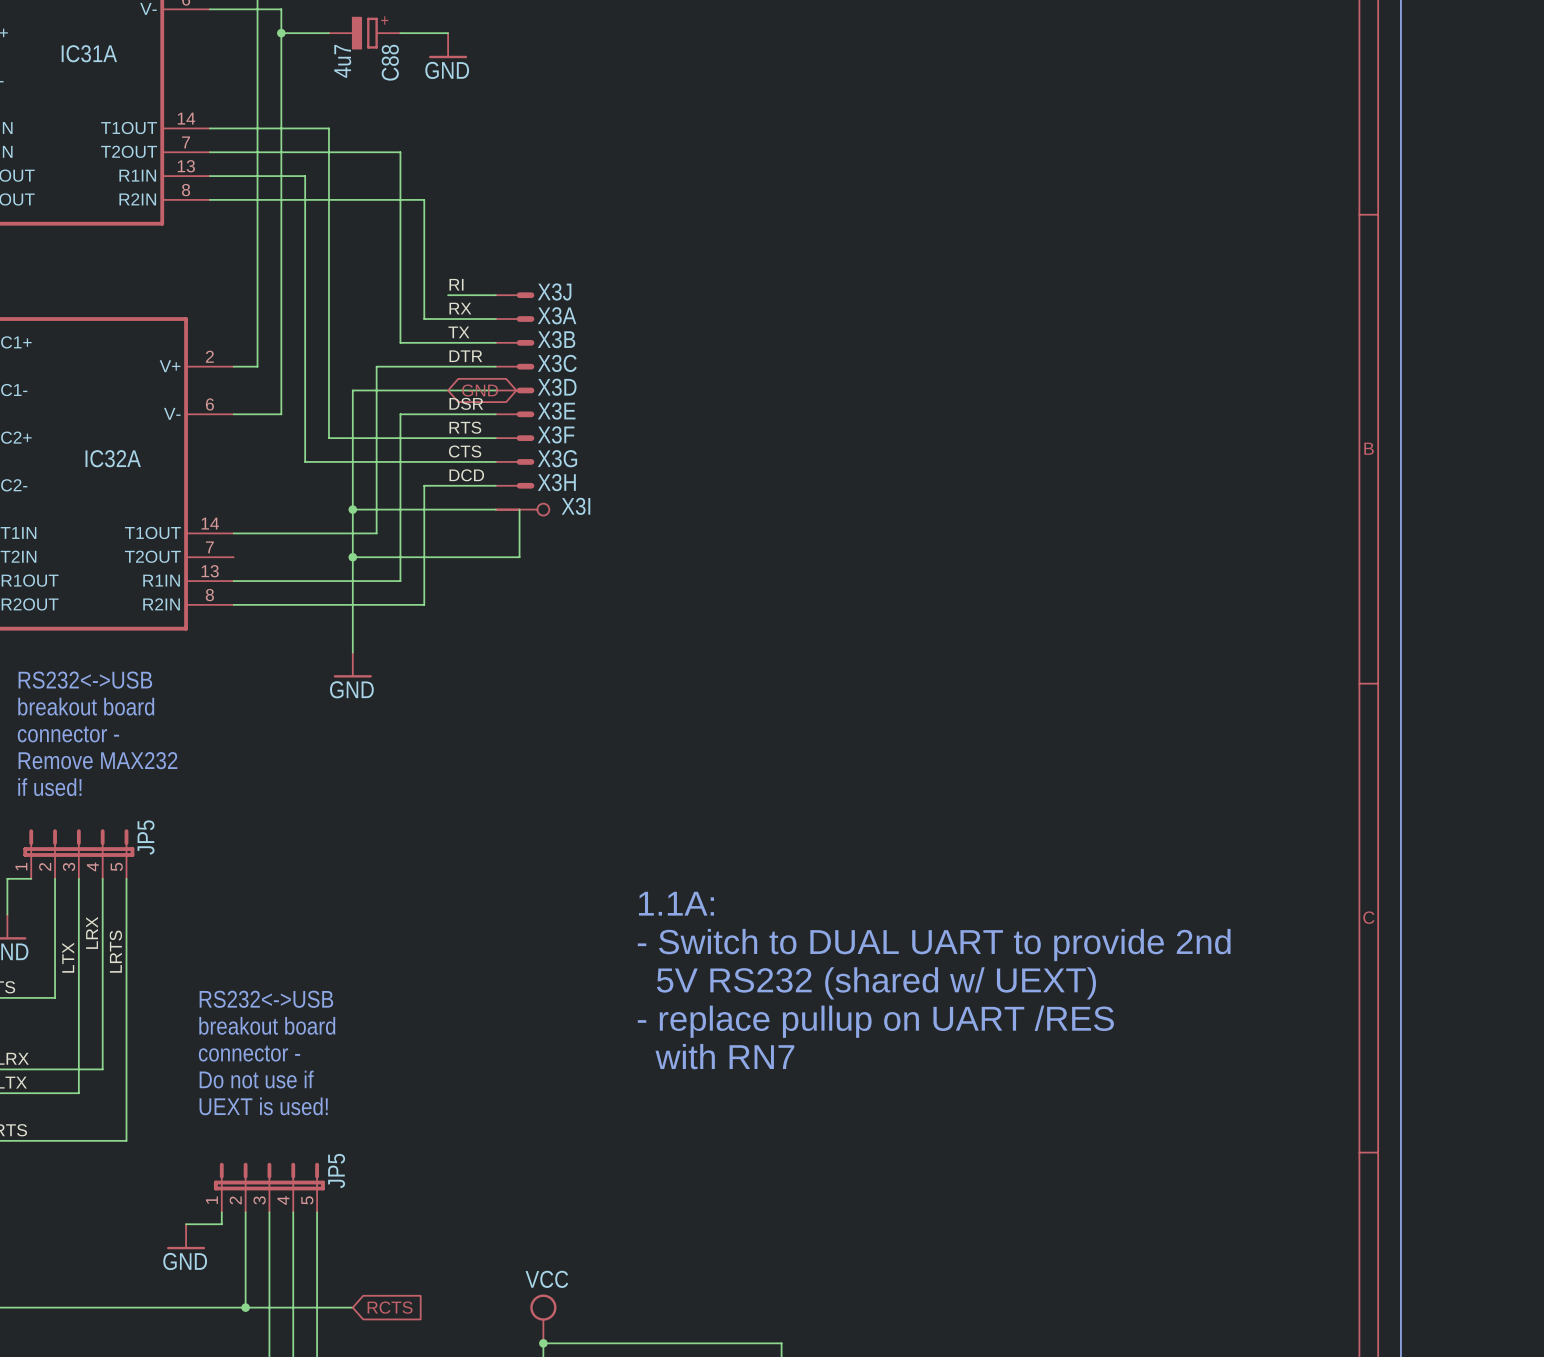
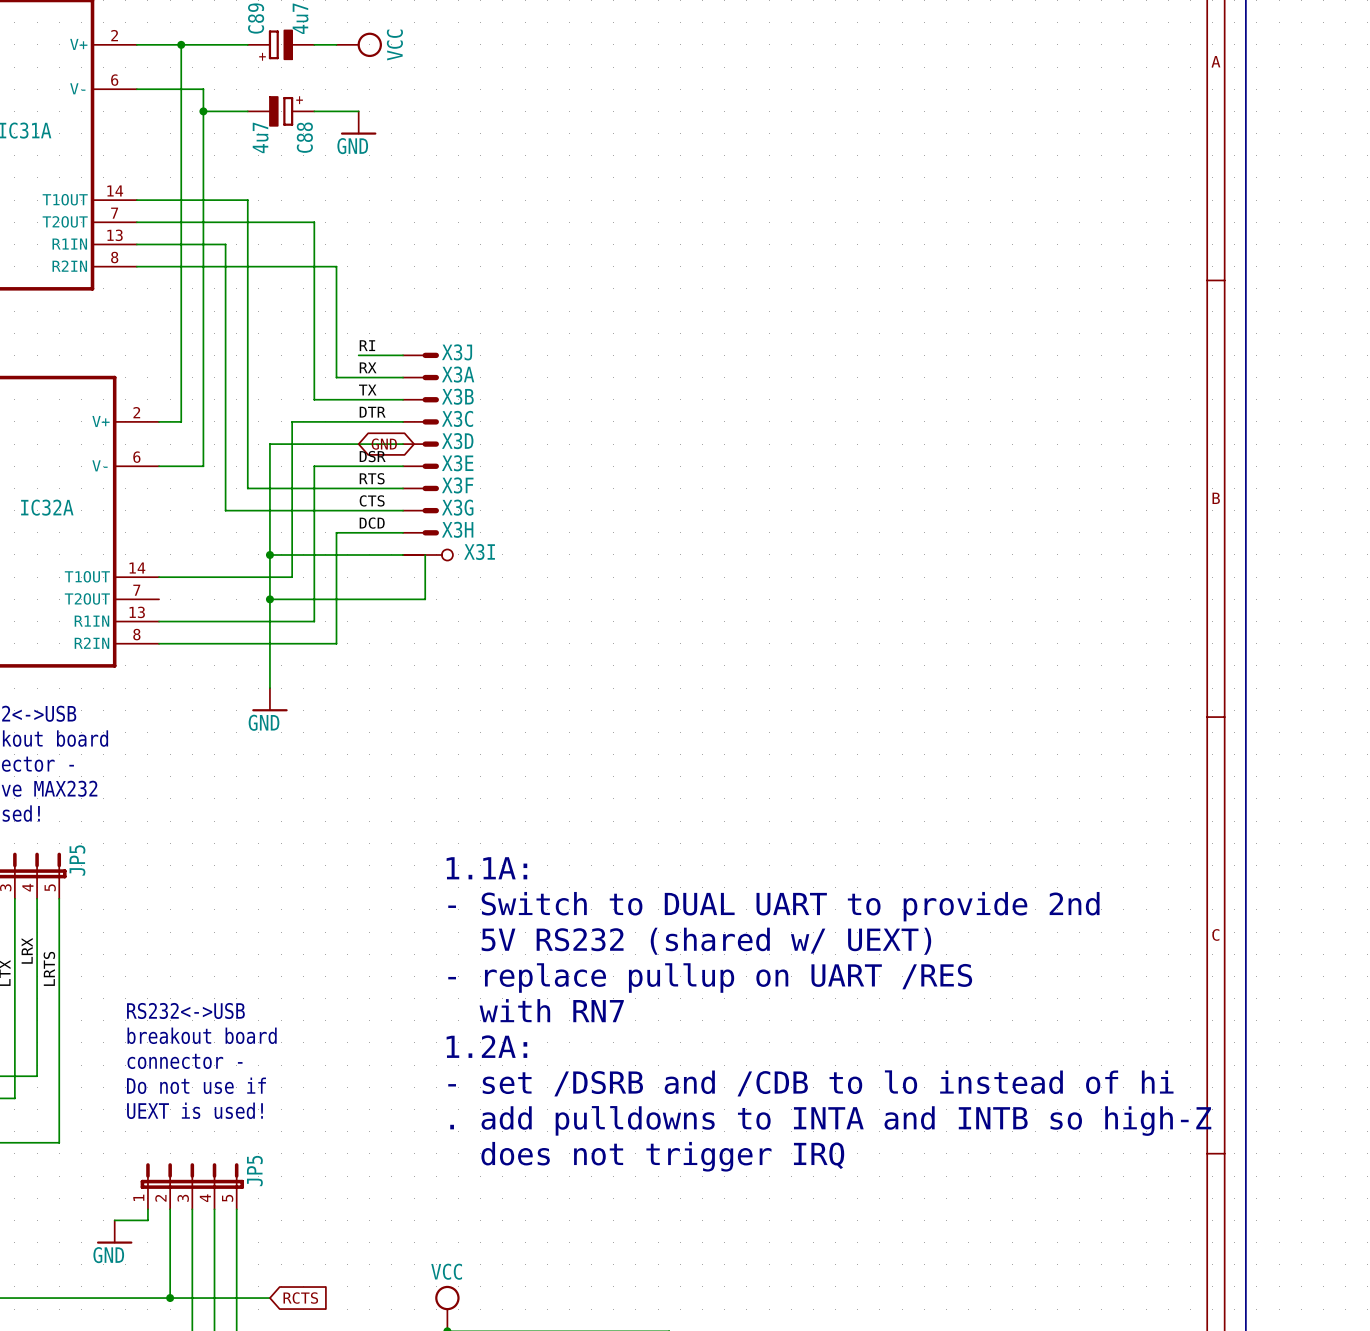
text position: 1.1A: (676, 903) -> 1.1A: (486, 868)
text position: - Switch to DUAL UART to provide 2nd (934, 945) -> - Switch to DUAL UART to provide 2nd (773, 906)
text position: 5V RS232 (shared w/ UEXT) (876, 983) -> 5V RS232 (shared w/ UEXT) (706, 941)
text position: - replace pullup on UART /RES (875, 1021) -> - replace pullup on UART /RES (710, 978)
text: none -> 1.2A: (486, 1046)
text position: with RN7 (724, 1056) -> with RN7 (551, 1010)
text: none -> - set /DSRB and /CDB to lo instead of hi (810, 1083)
text: none -> . add pulldowns to INTA and INTB so high-Z (830, 1120)
text: none -> does not trigger IRQ (662, 1156)

